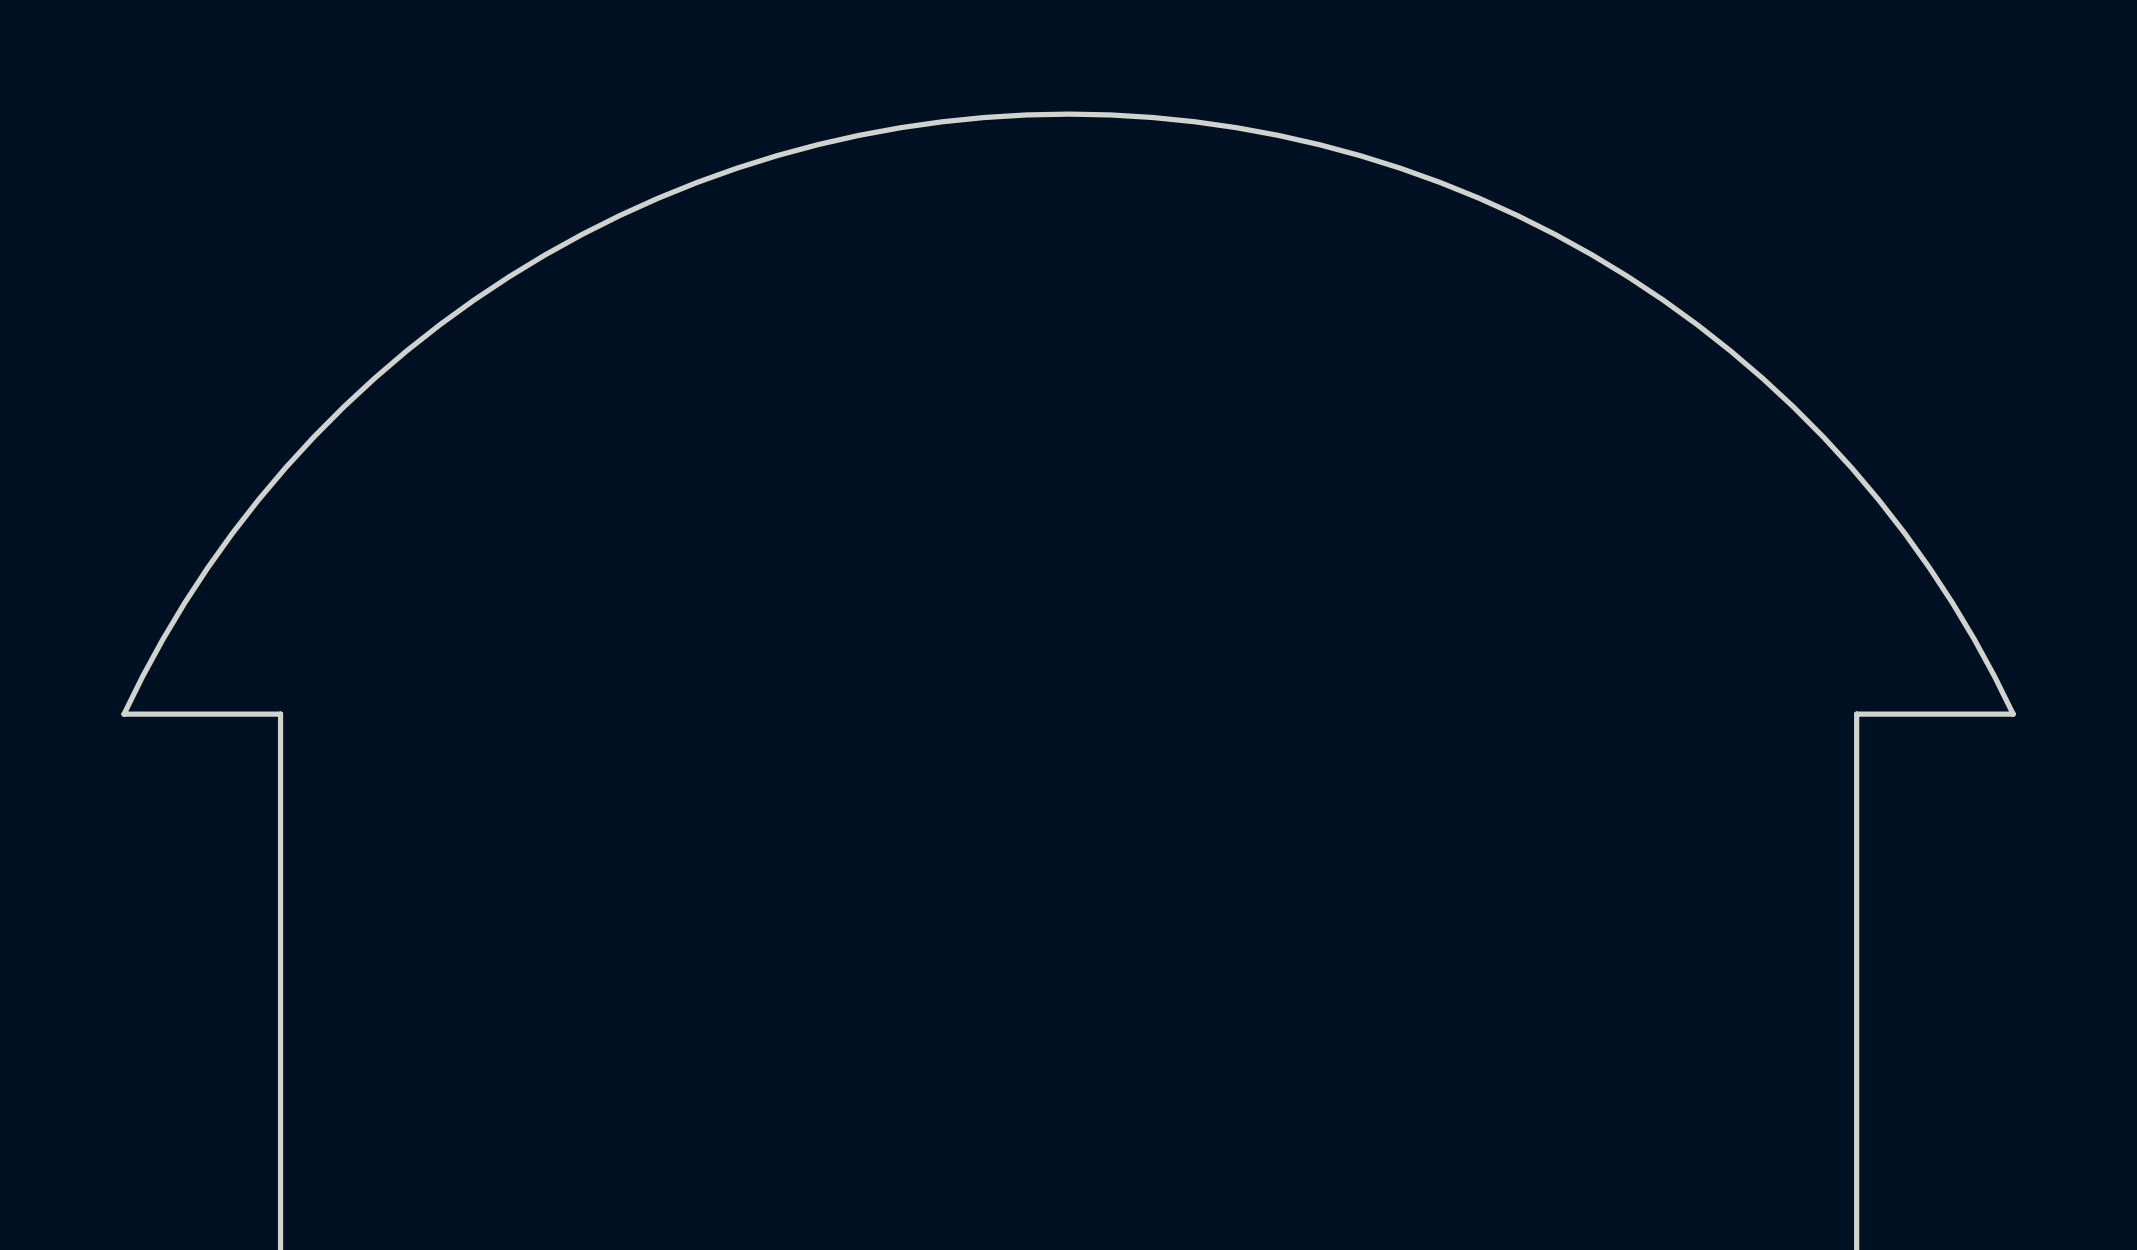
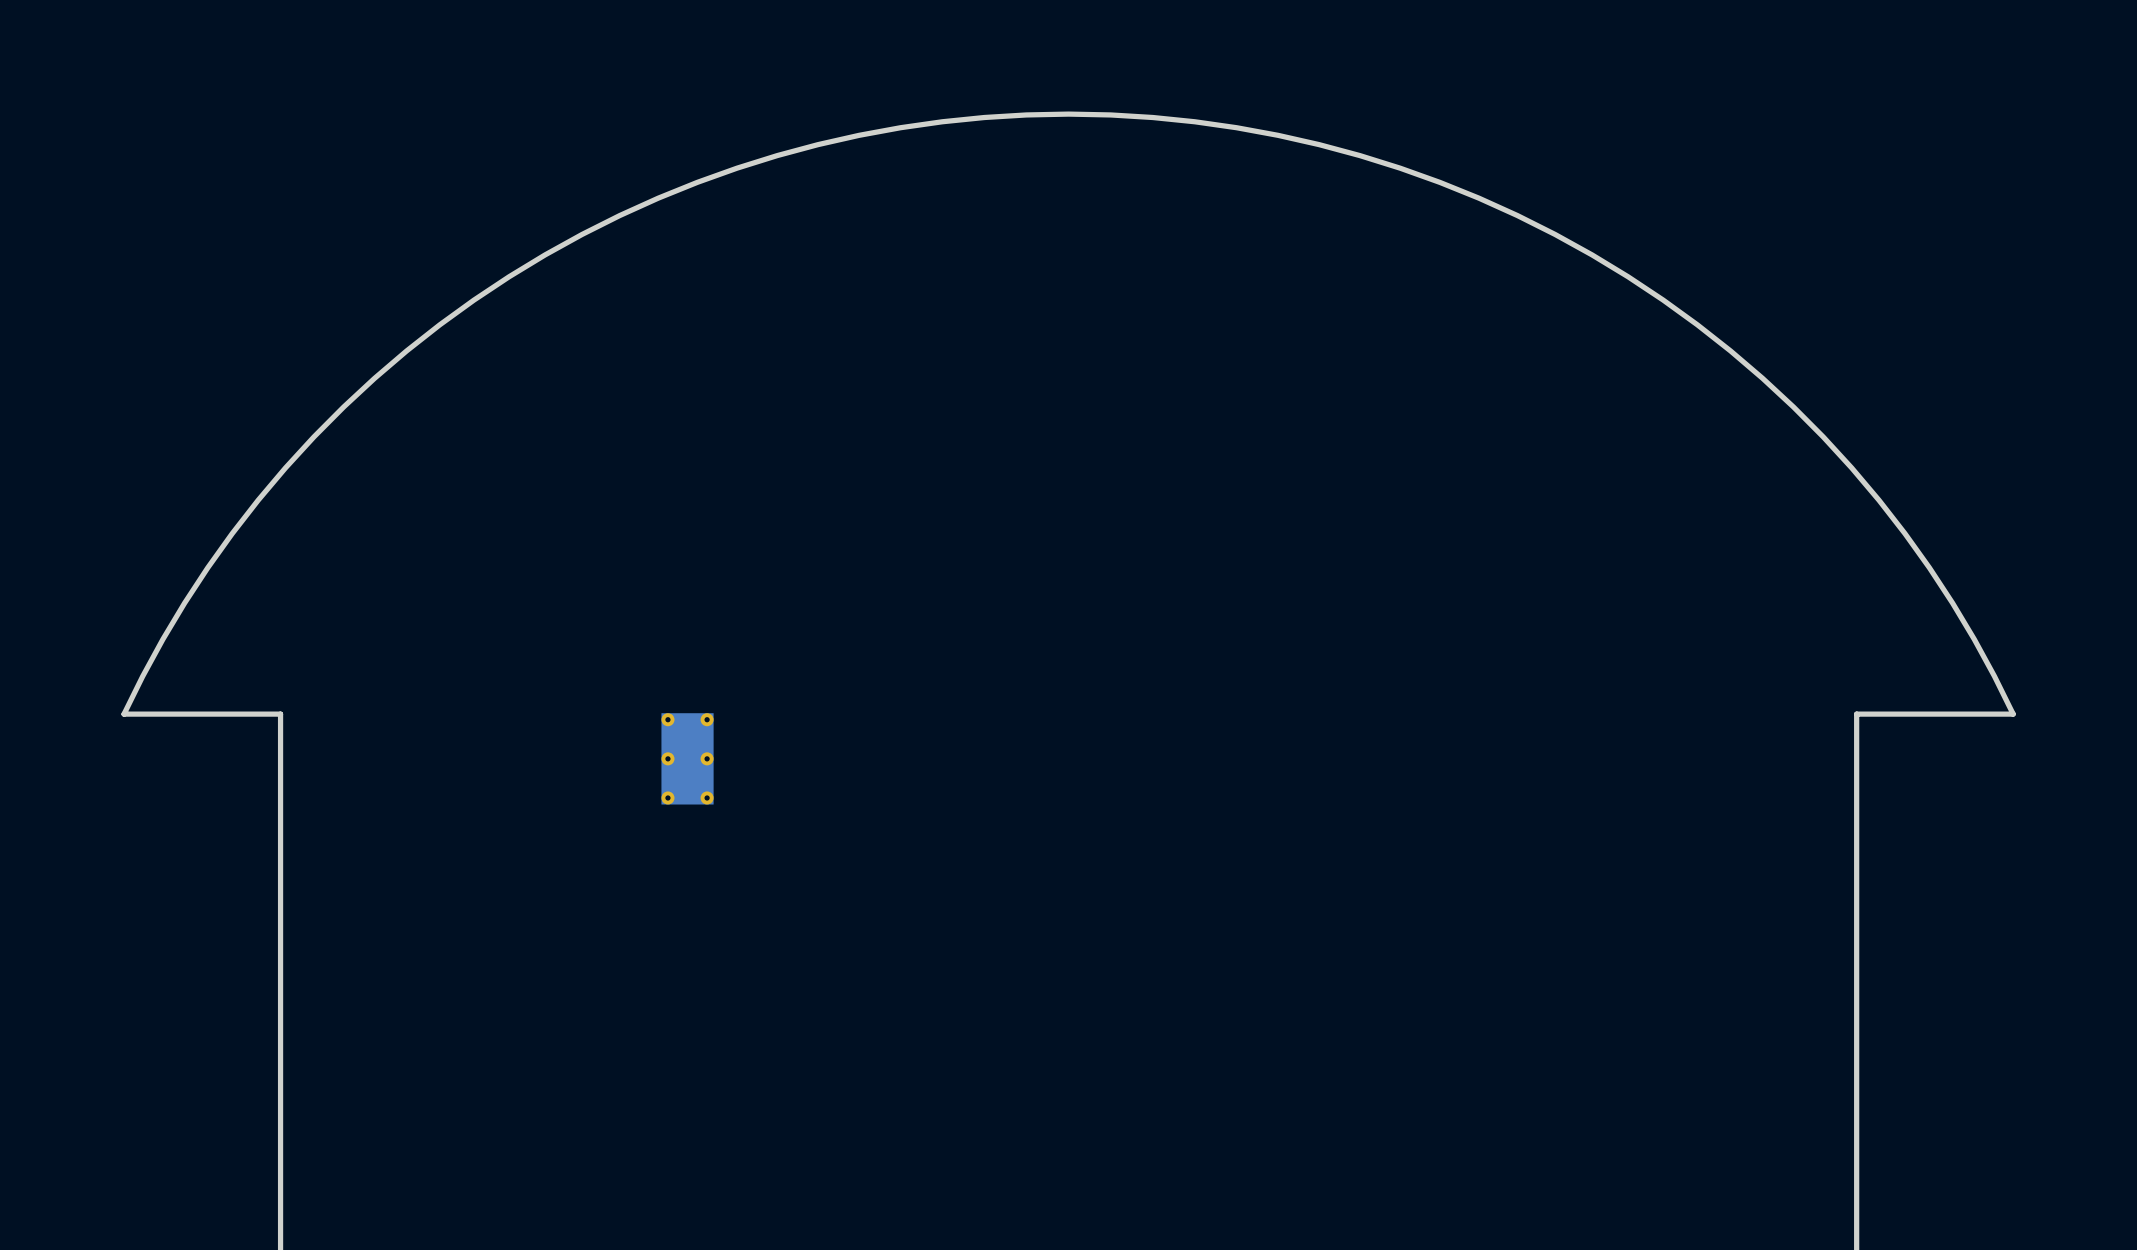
part: none -> (687, 758)

